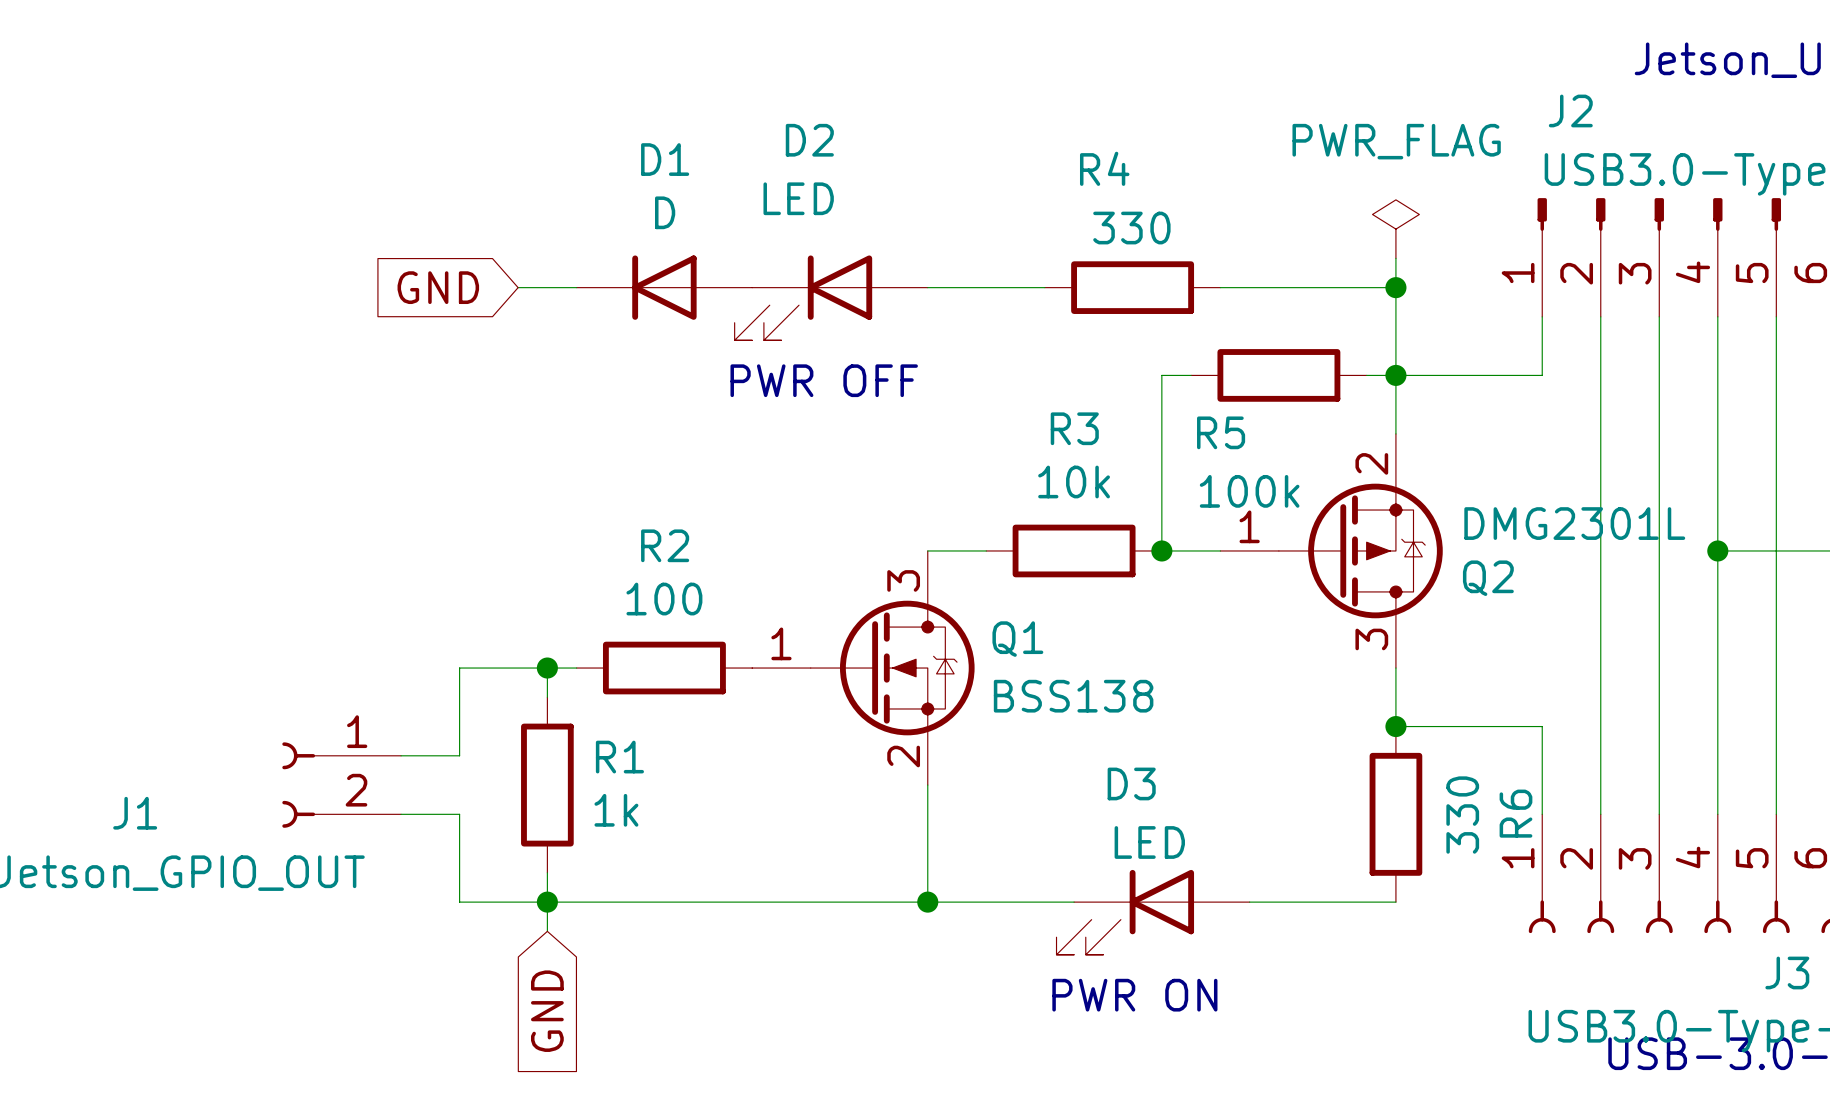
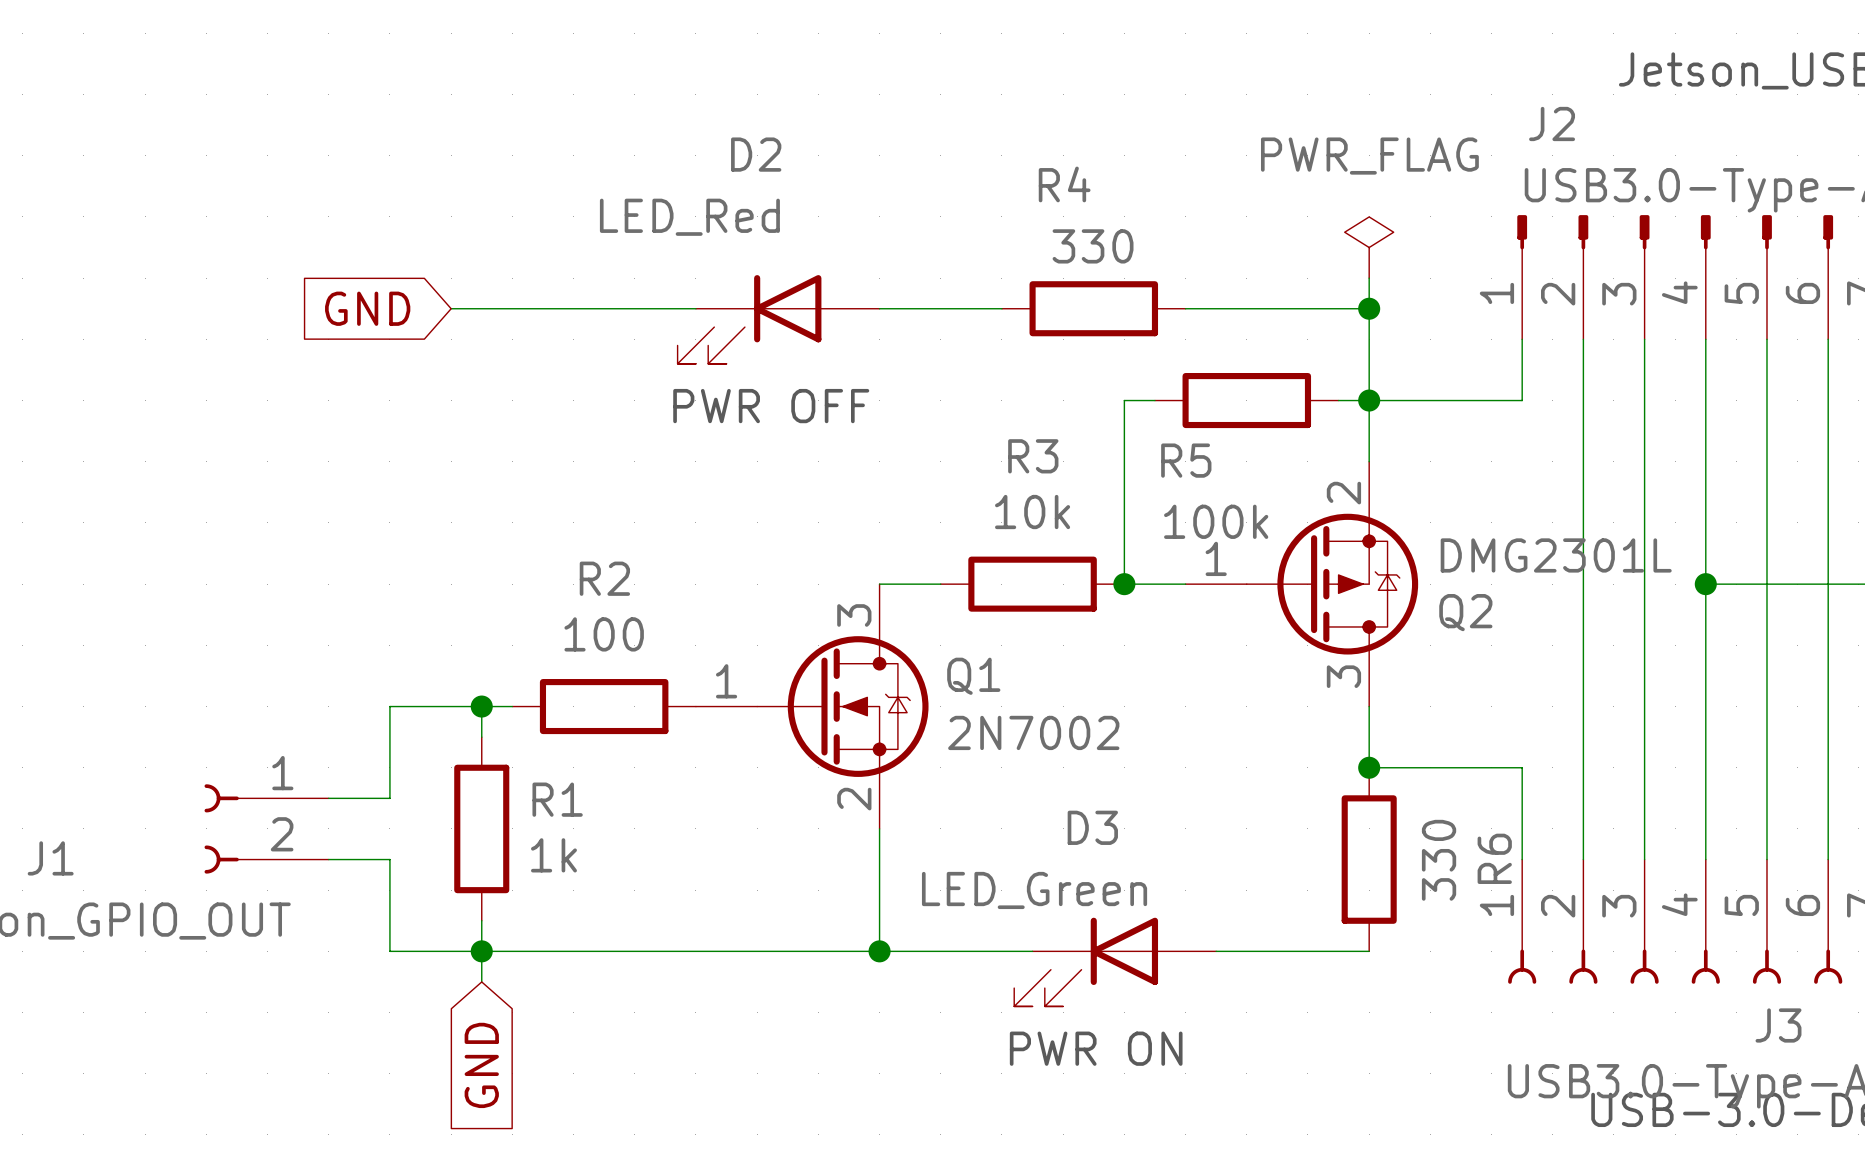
D2 value: LED (798, 198) -> LED_Red (689, 217)
D1: D (664, 287) -> none
Q1 value: BSS138 (1073, 696) -> 2N7002 (1033, 732)
D3 value: LED (1149, 842) -> LED_Green (1034, 890)

